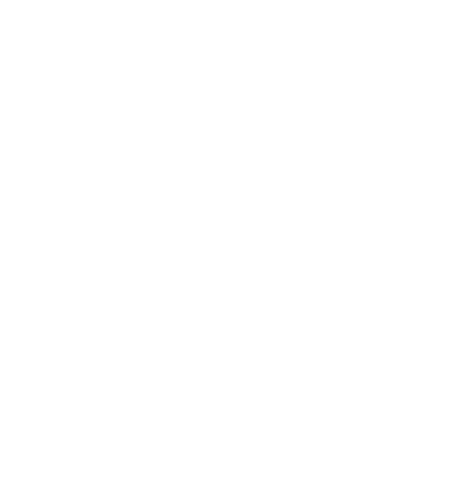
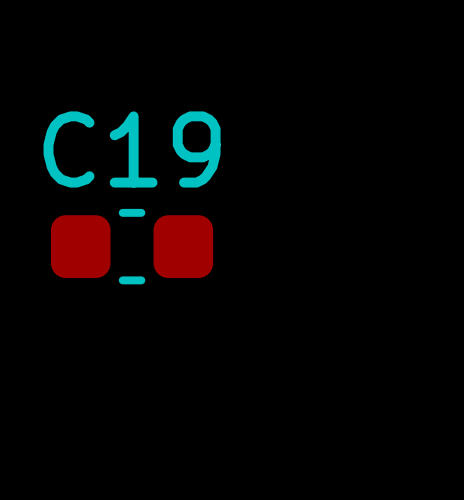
C19: none -> (132, 246)

